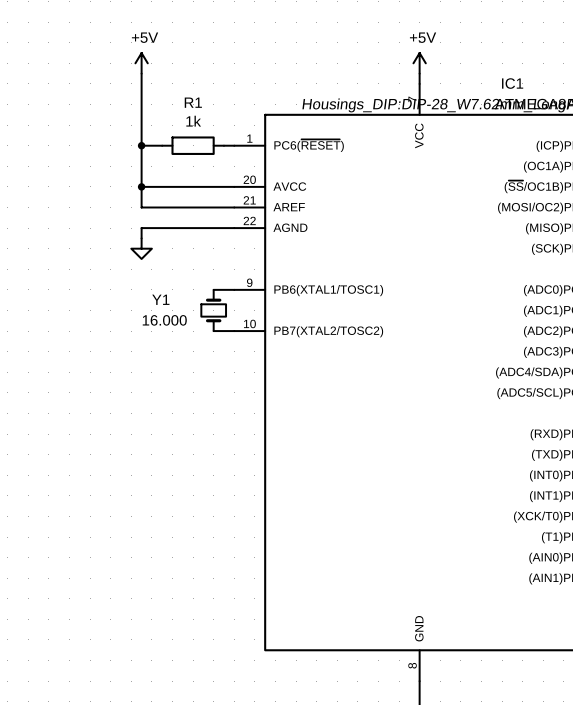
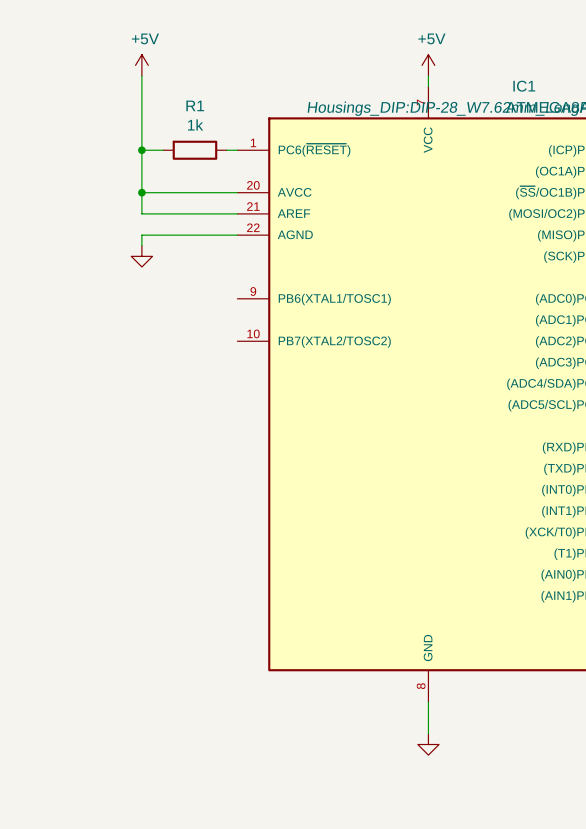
wire: (213, 289) (234, 289) -> none
Y1: 16.000 (213, 310) -> none
wire: (213, 331) (234, 331) -> none

